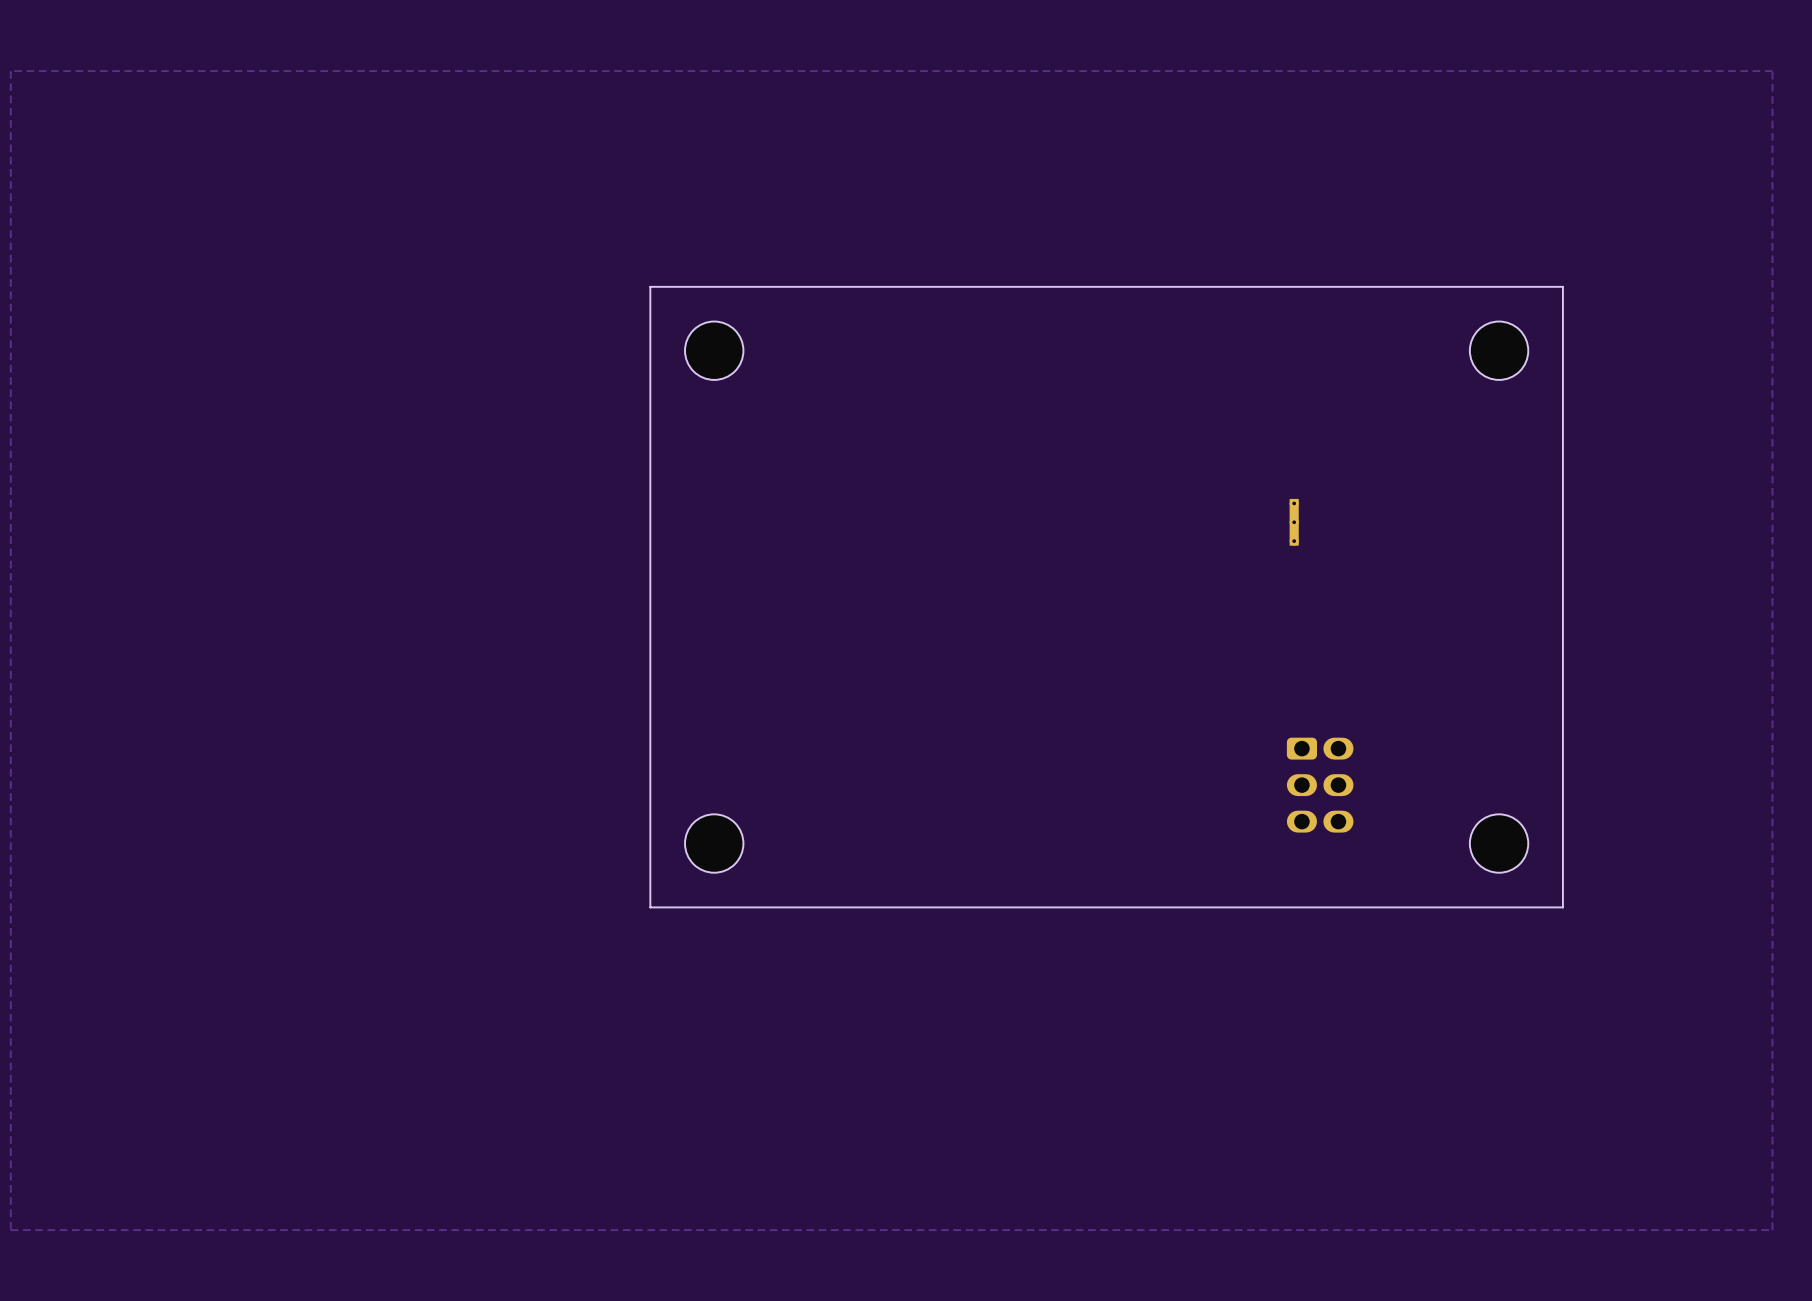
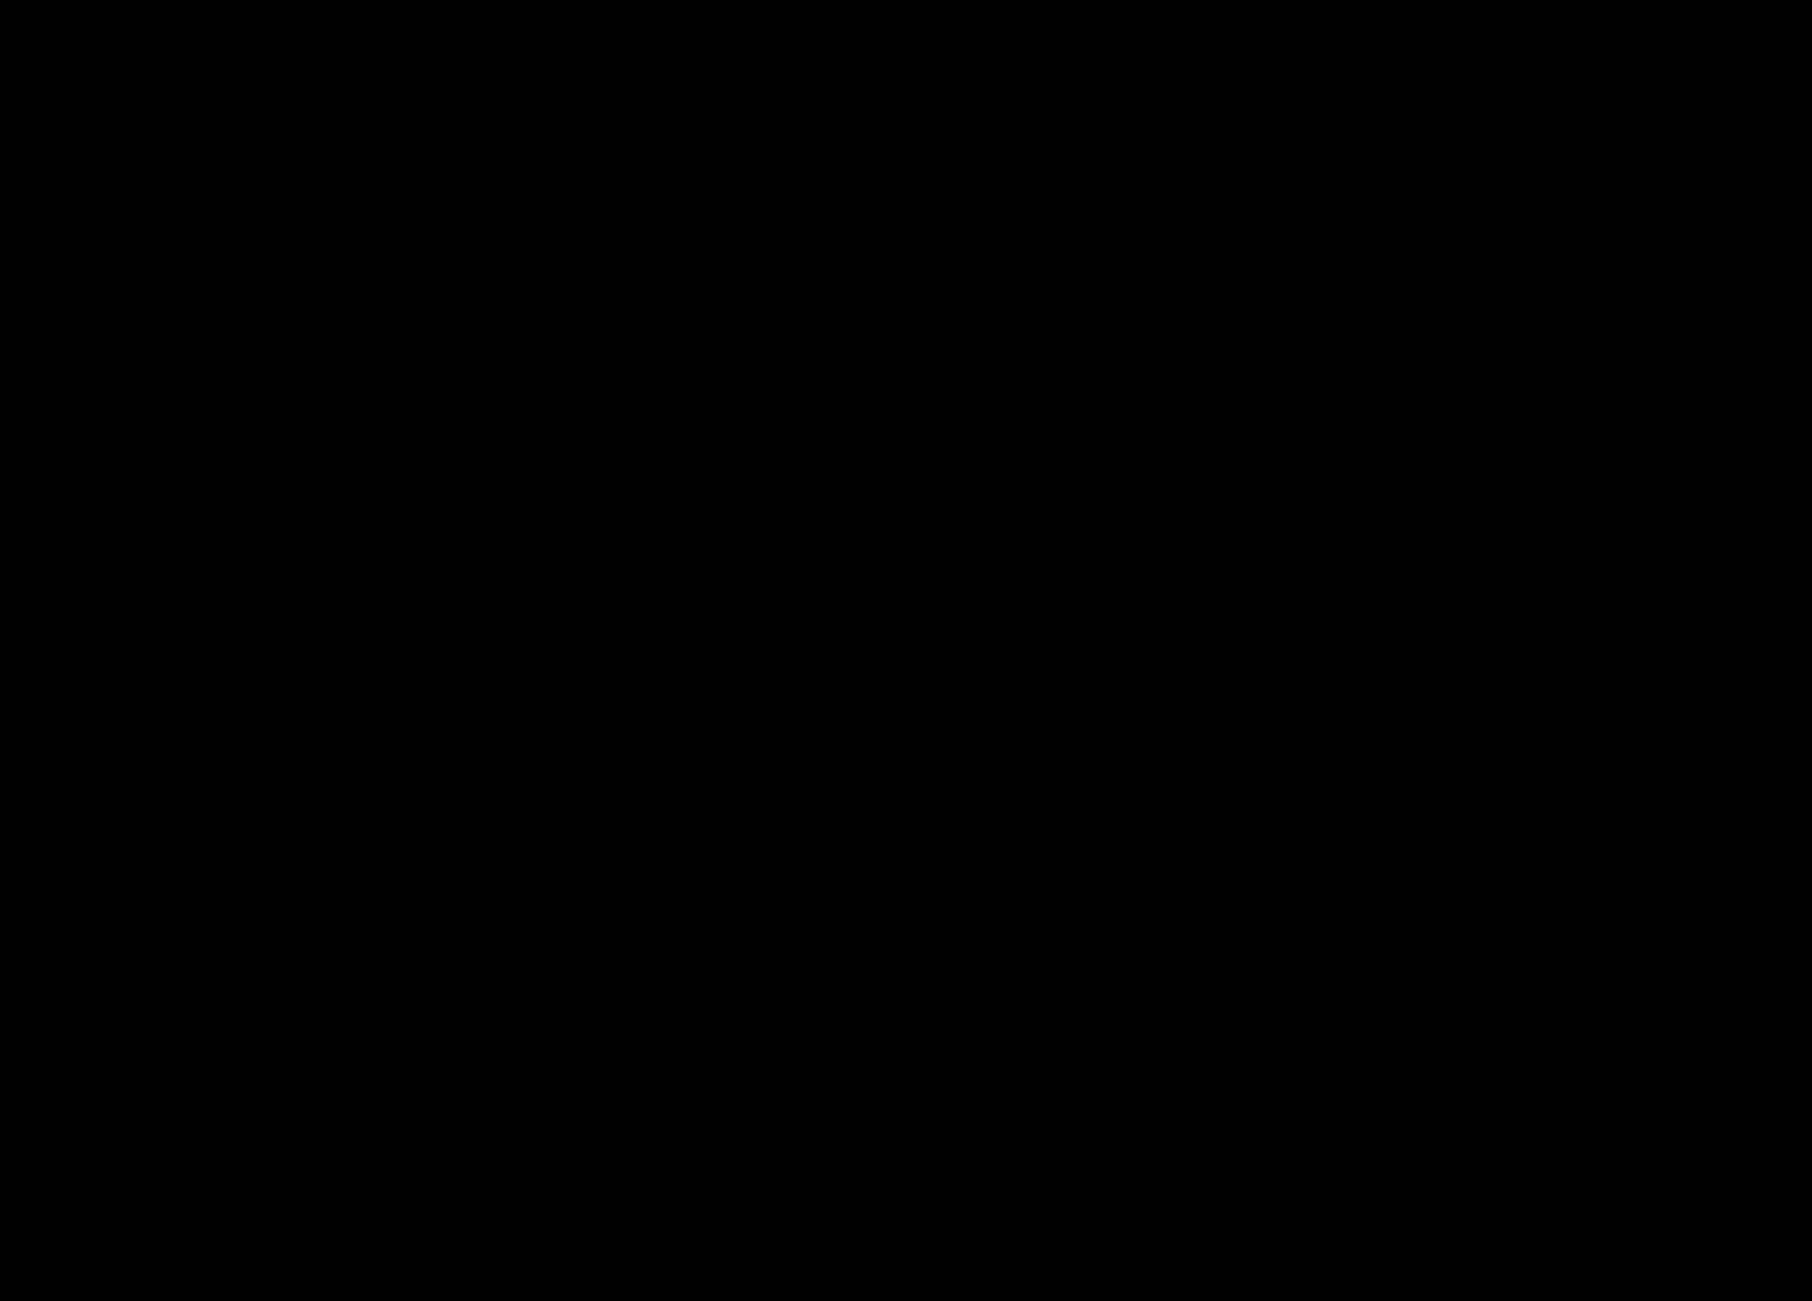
zone outline: (1772, 71) (1772, 1230) (10, 1230) (10, 71) (1772, 71) -> none
board edge: (1562, 286) (650, 286) (650, 907) (1562, 907) (1562, 286) -> none
part: (714, 350) -> none
part: (1499, 350) -> none
part: (1294, 522) -> none
part: (1320, 785) -> none
part: (714, 843) -> none
part: (1499, 843) -> none

